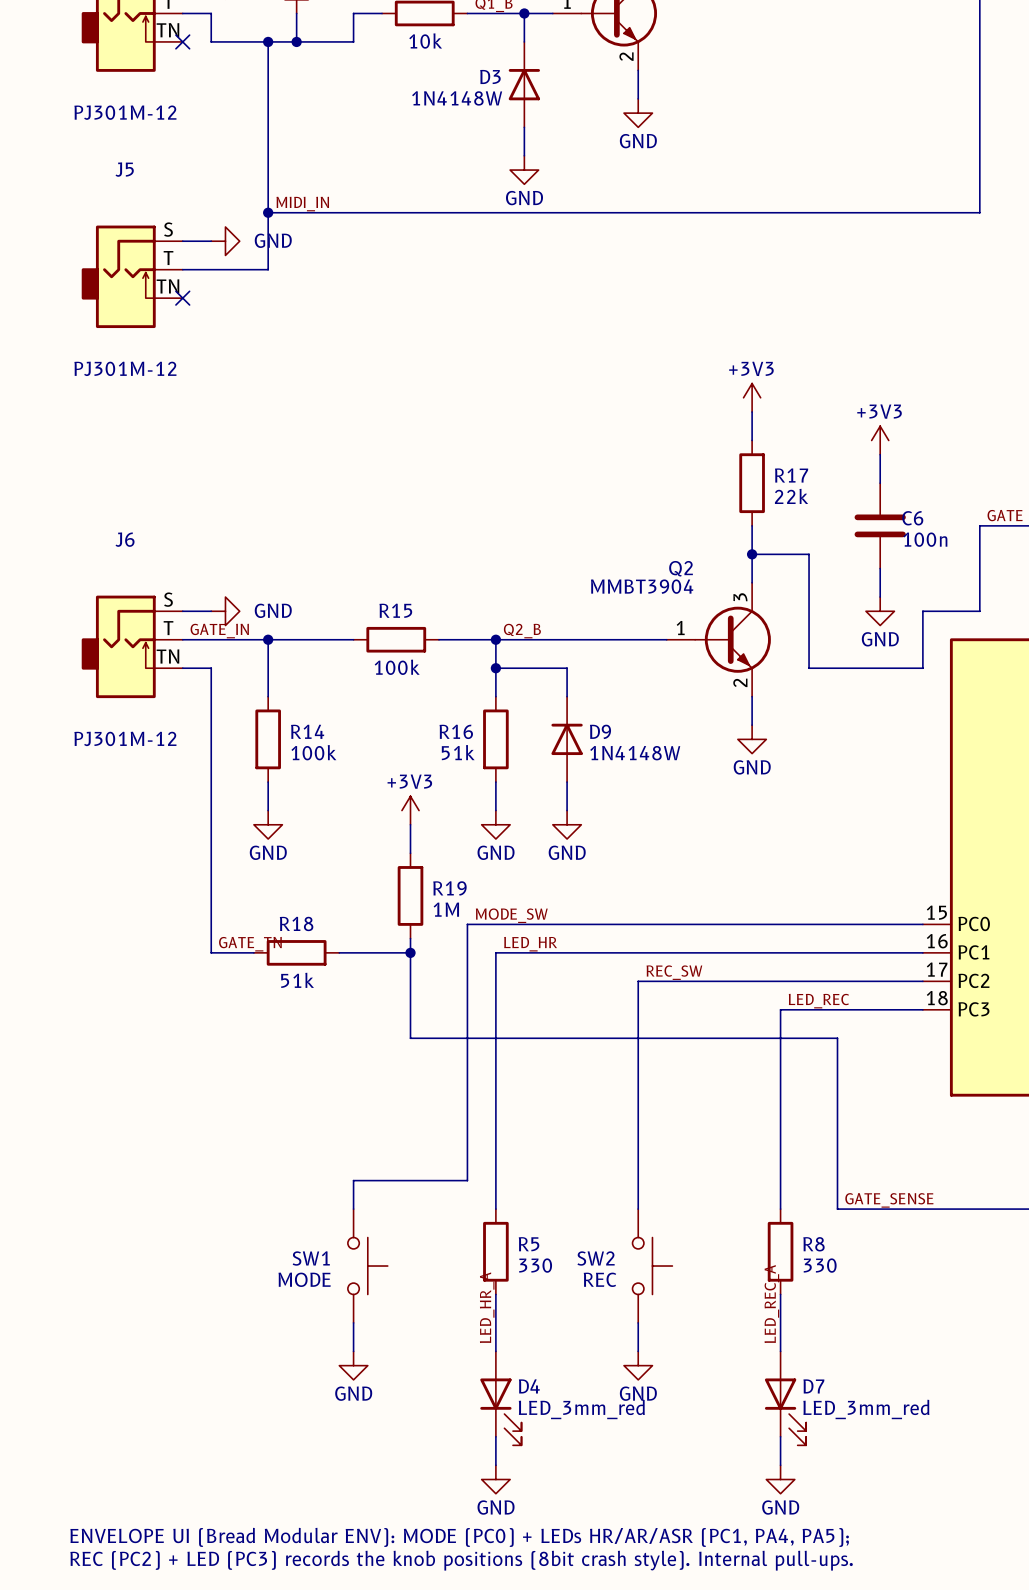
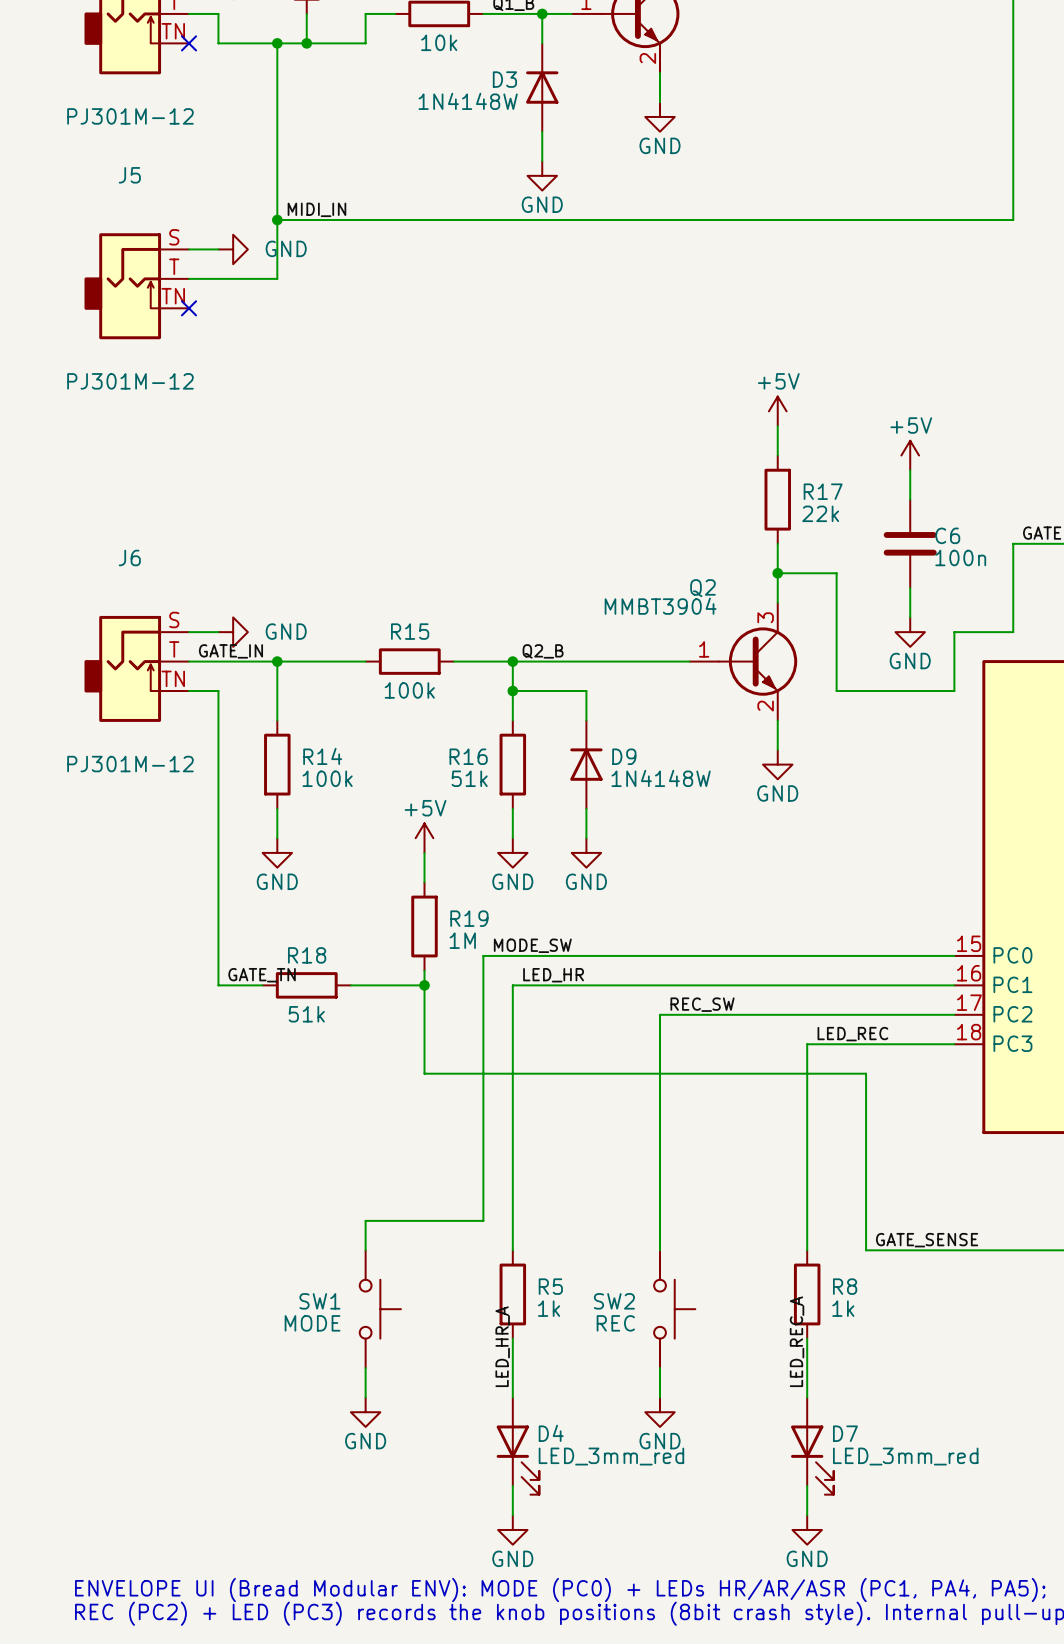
power symbol: +3V3 (752, 397) -> +5V (777, 411)
power symbol: +3V3 (880, 440) -> +5V (910, 455)
power symbol: +3V3 (410, 810) -> +5V (424, 838)
R5 value: 330 (535, 1265) -> 1k (549, 1308)
R8 value: 330 (820, 1265) -> 1k (843, 1308)

